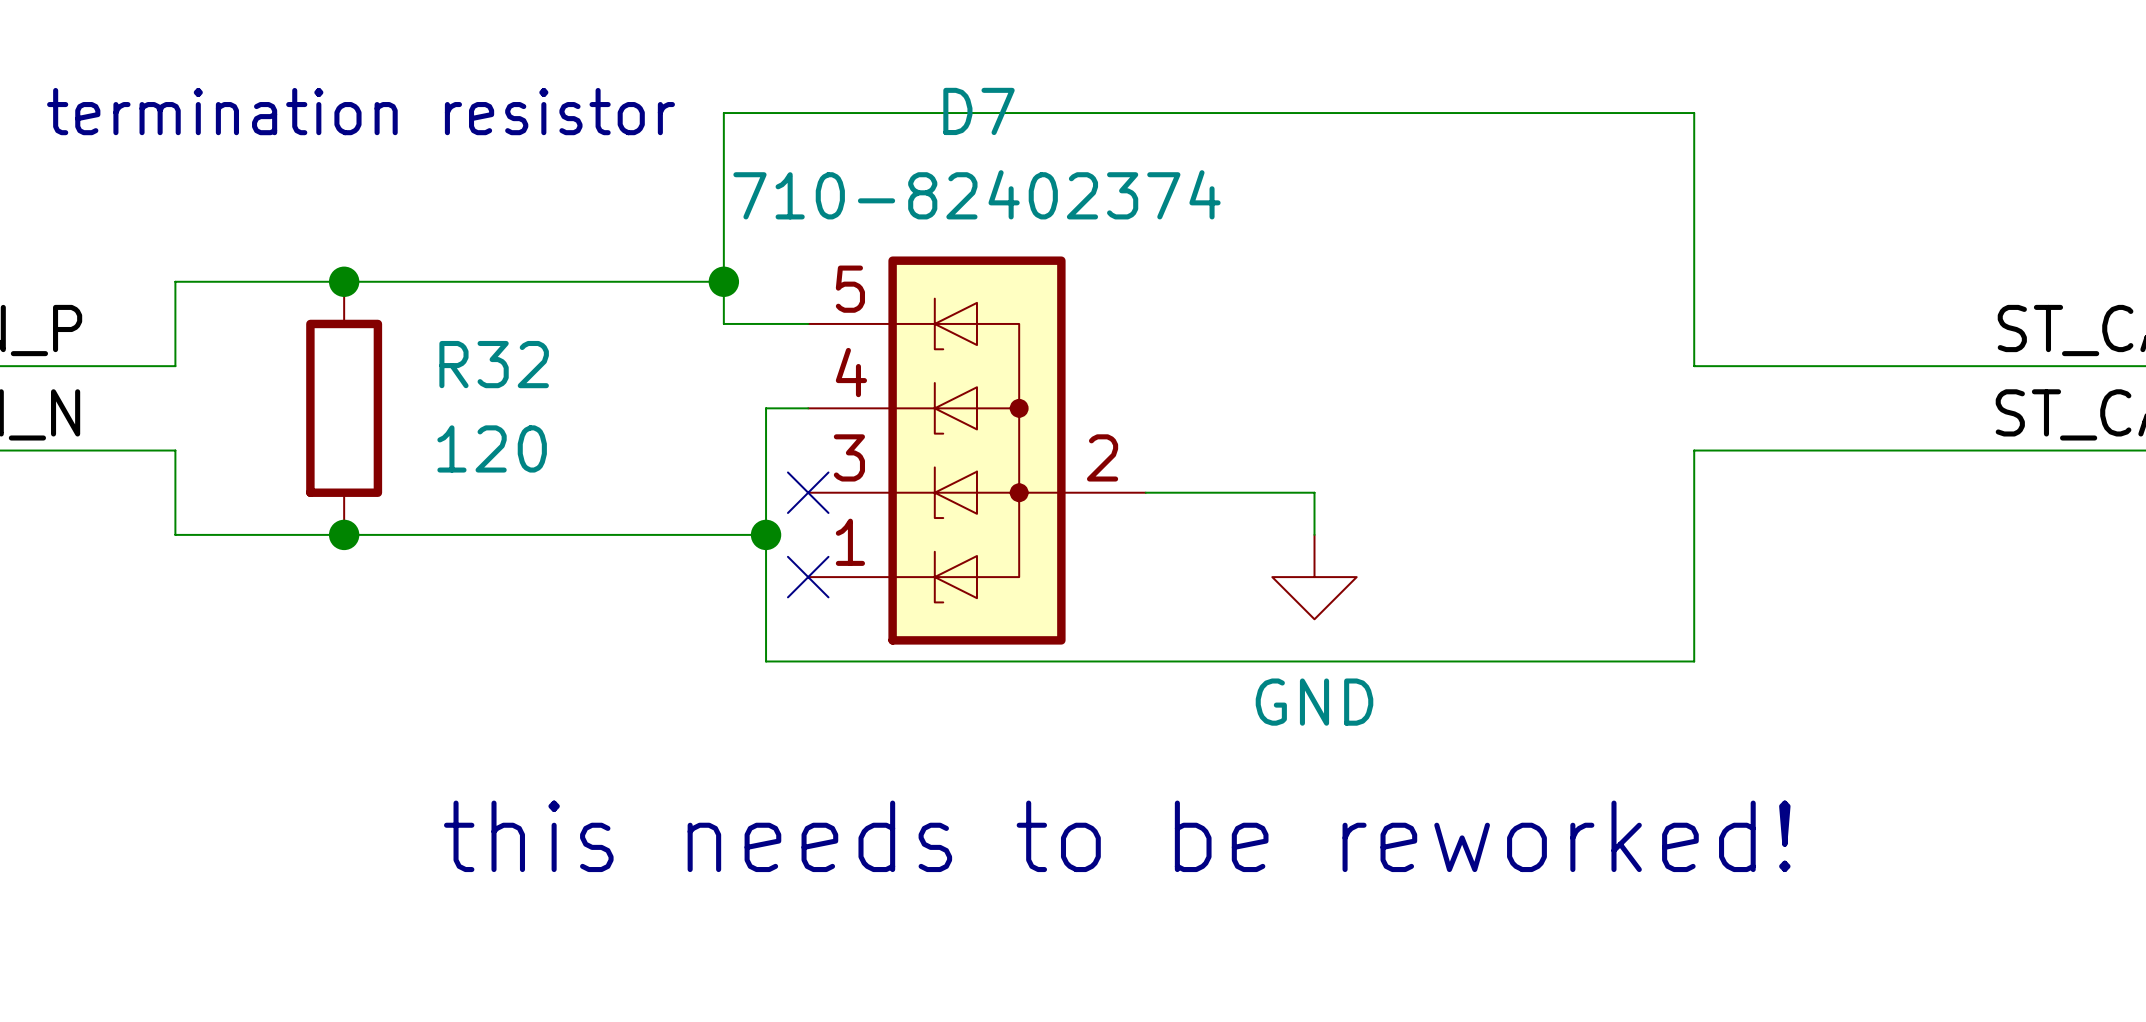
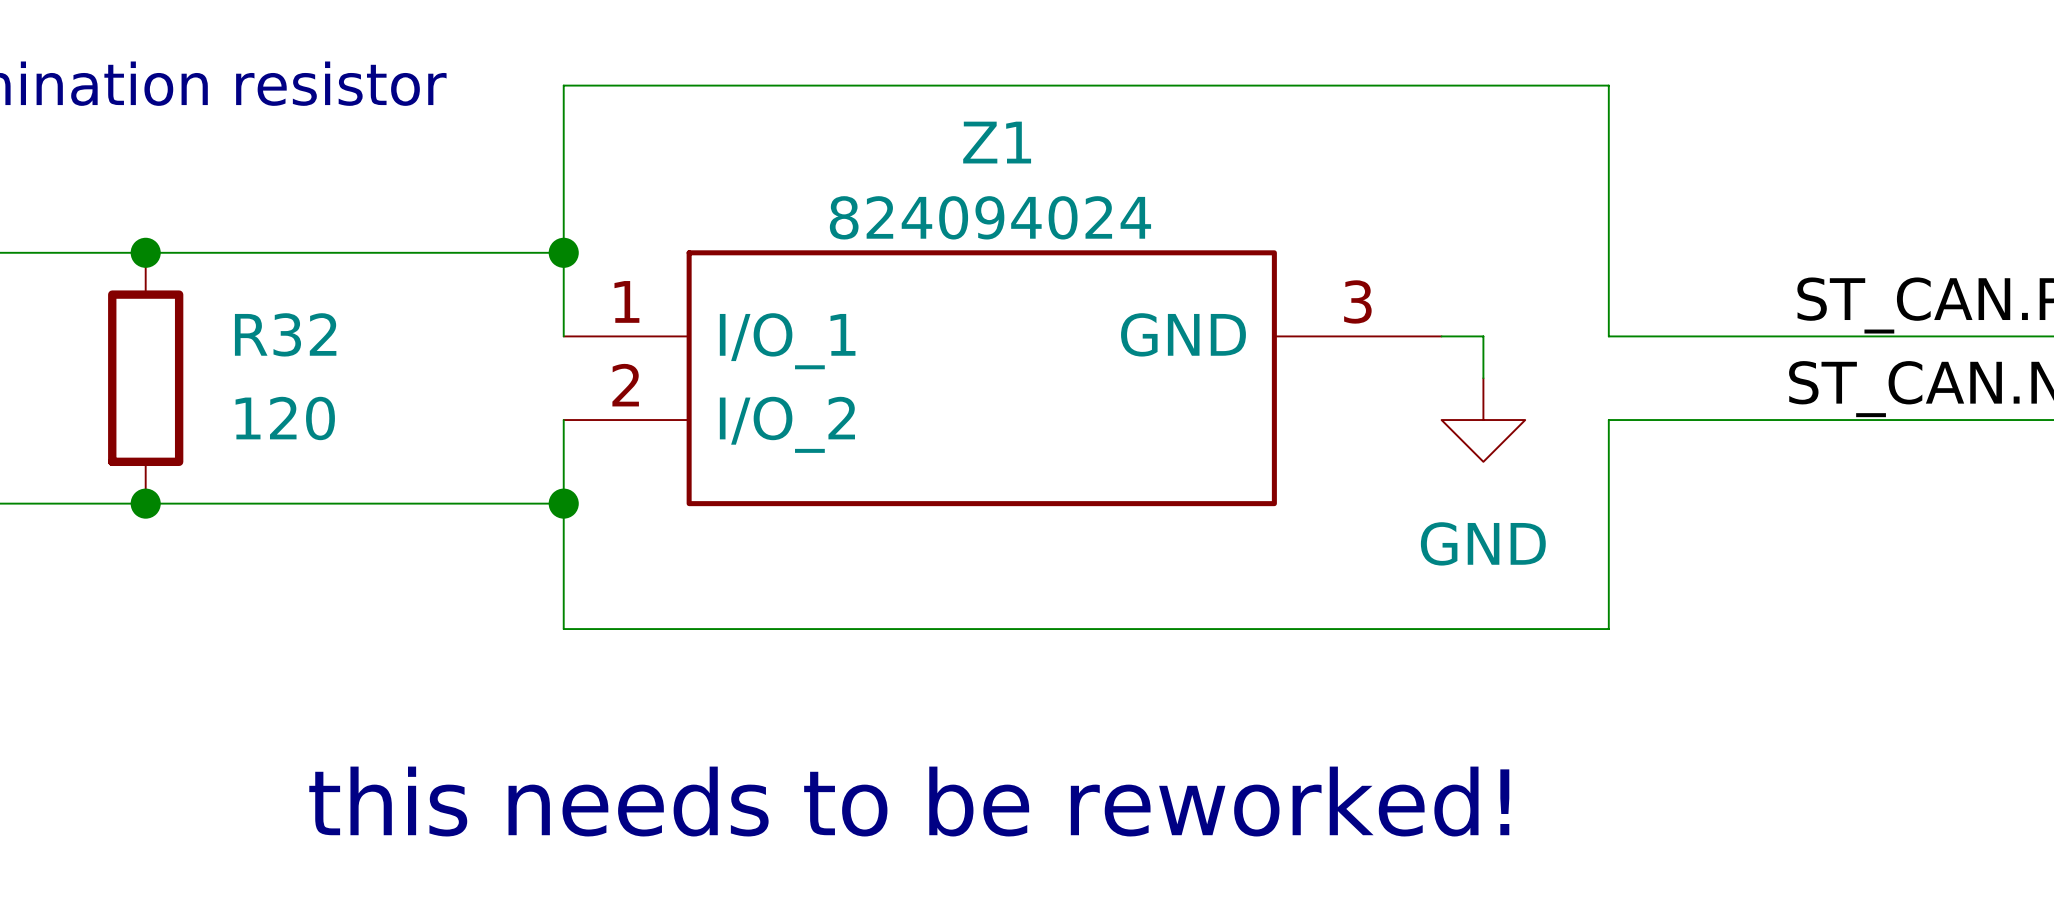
wire: (766, 113) (723, 113) (723, 323) (808, 323) -> (563, 85) (563, 336)
wire: (1694, 113) (1694, 366) (1820, 366) -> (1483, 85) (1608, 85) (1608, 336)
wire: none -> (521, 252) (563, 252)
junction position: (723, 281) -> (563, 252)
wire: none -> (1441, 336) (1483, 336) (1483, 378)
wire: (808, 408) (766, 408) (766, 450) -> none
Z1: none -> 824094024 (1002, 378)
D7: 710-82402374 (976, 450) -> none
wire: (1820, 450) (1694, 450) (1694, 661) -> (1608, 420) (1608, 629) (1483, 629)
no-connect mark: (808, 492) -> none
wire: (1145, 492) (1314, 492) (1314, 534) -> none
no-connect mark: (808, 577) -> none
power symbol position: GND (1314, 577) -> GND (1483, 420)

